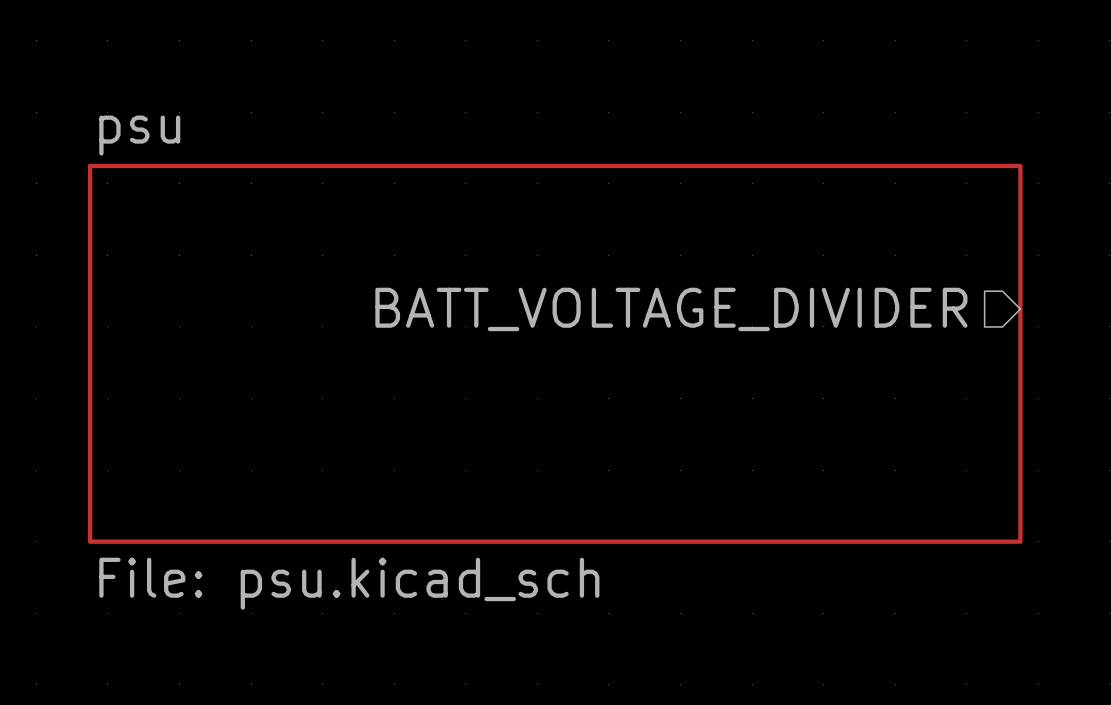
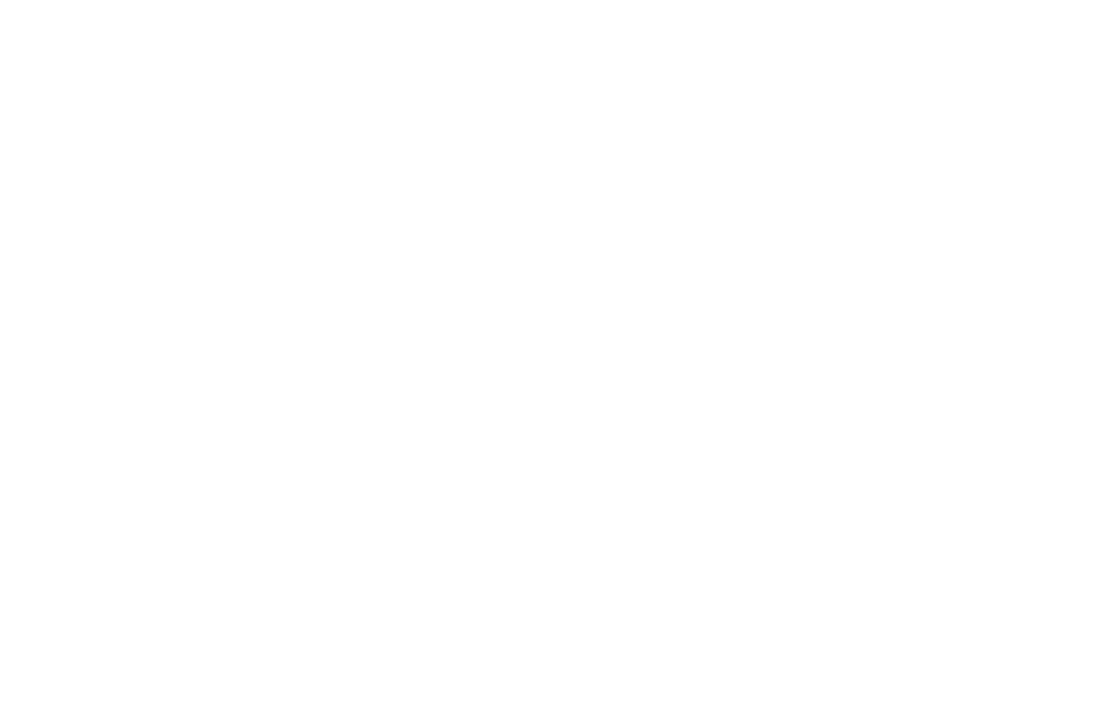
sheet pin: BATT_VOLTAGE_DIVIDER (671, 309) -> none
sheet psu: File: psu.kicad_sch (555, 353) -> none

